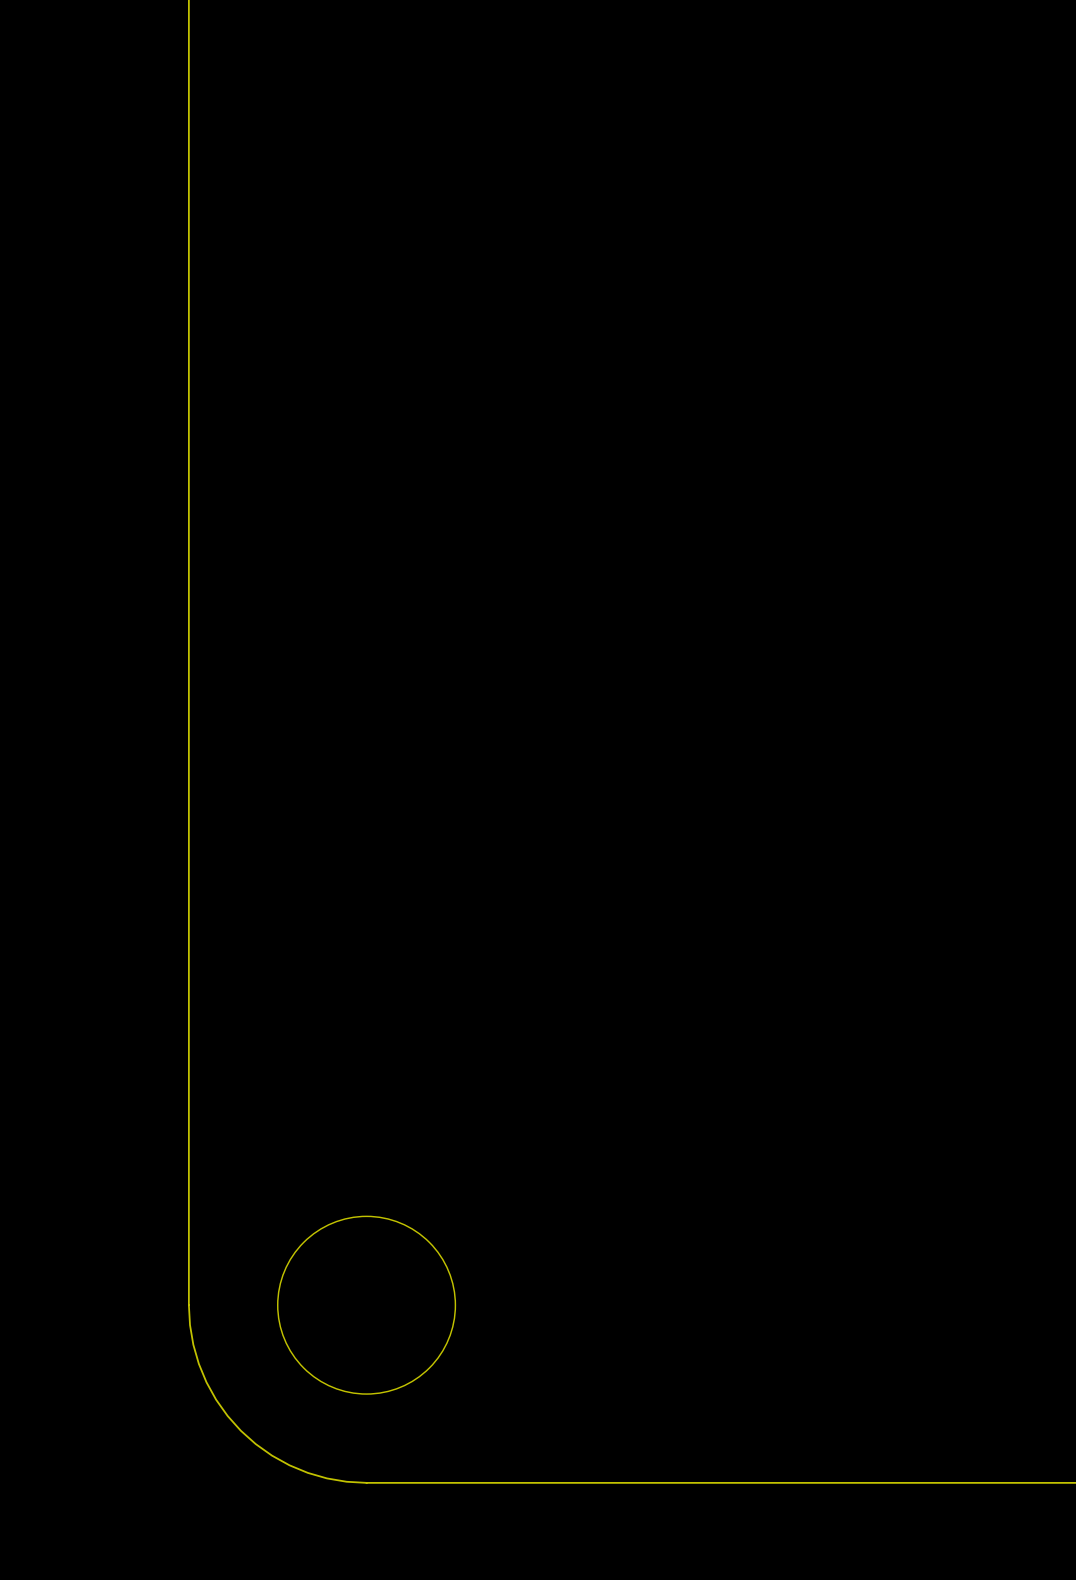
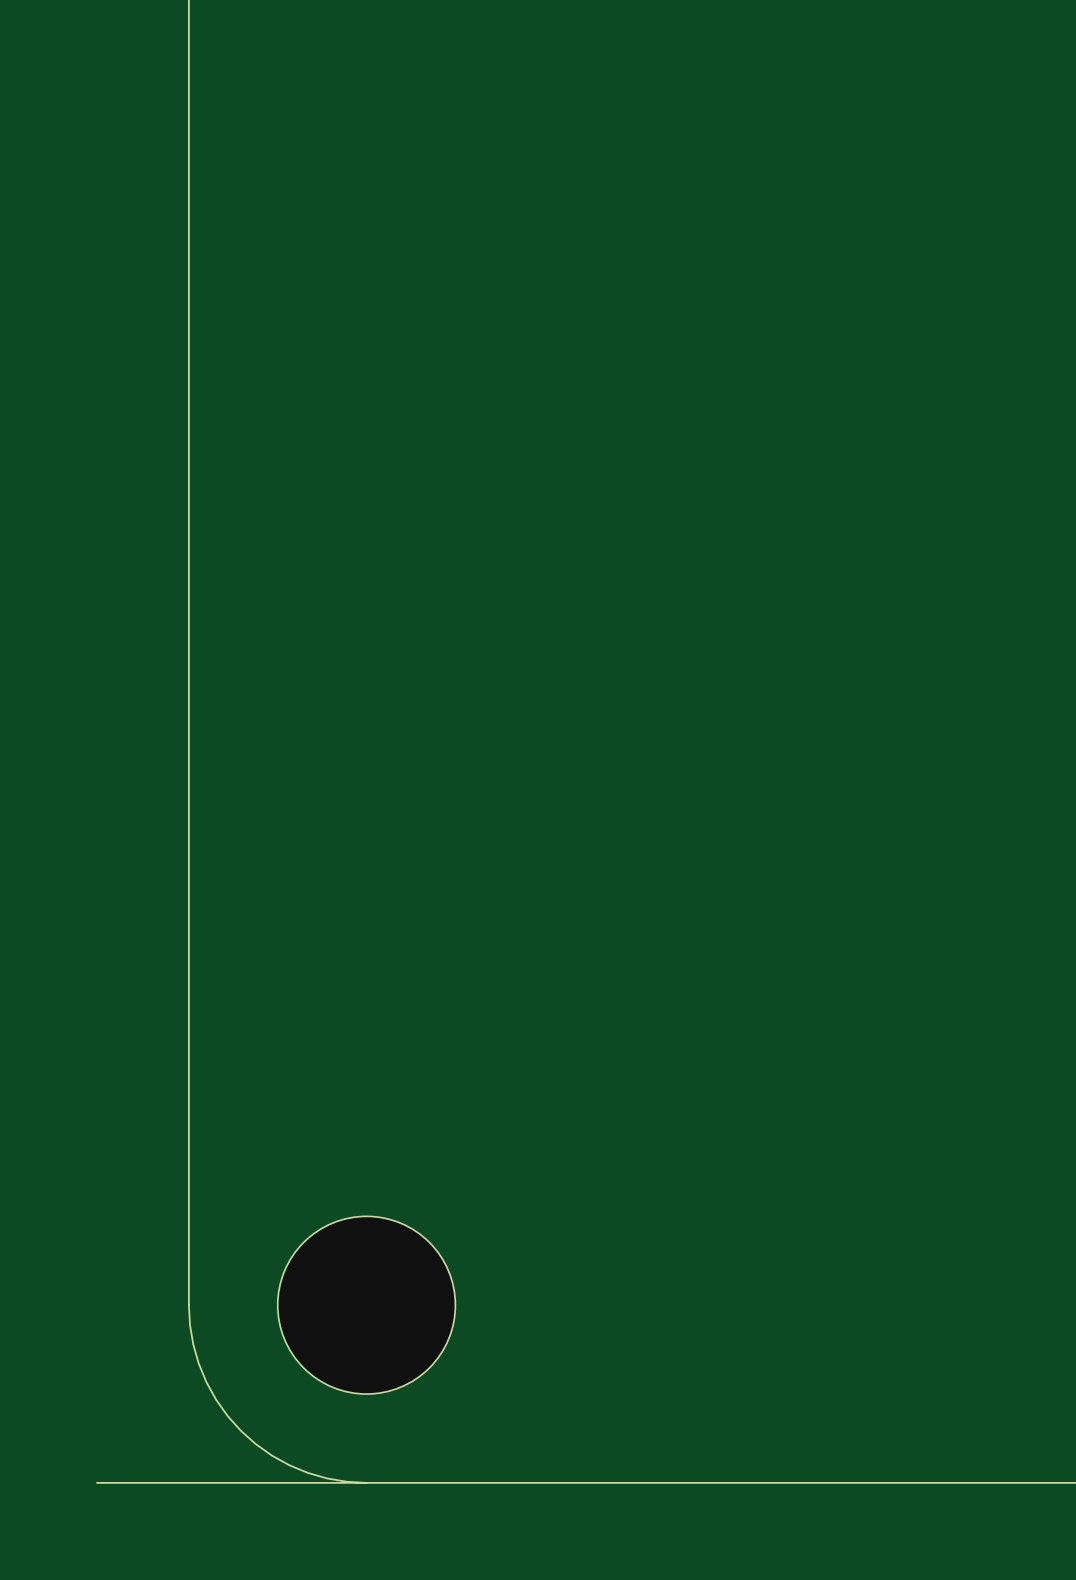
board edge: none -> (366, 1482) (96, 1482)

